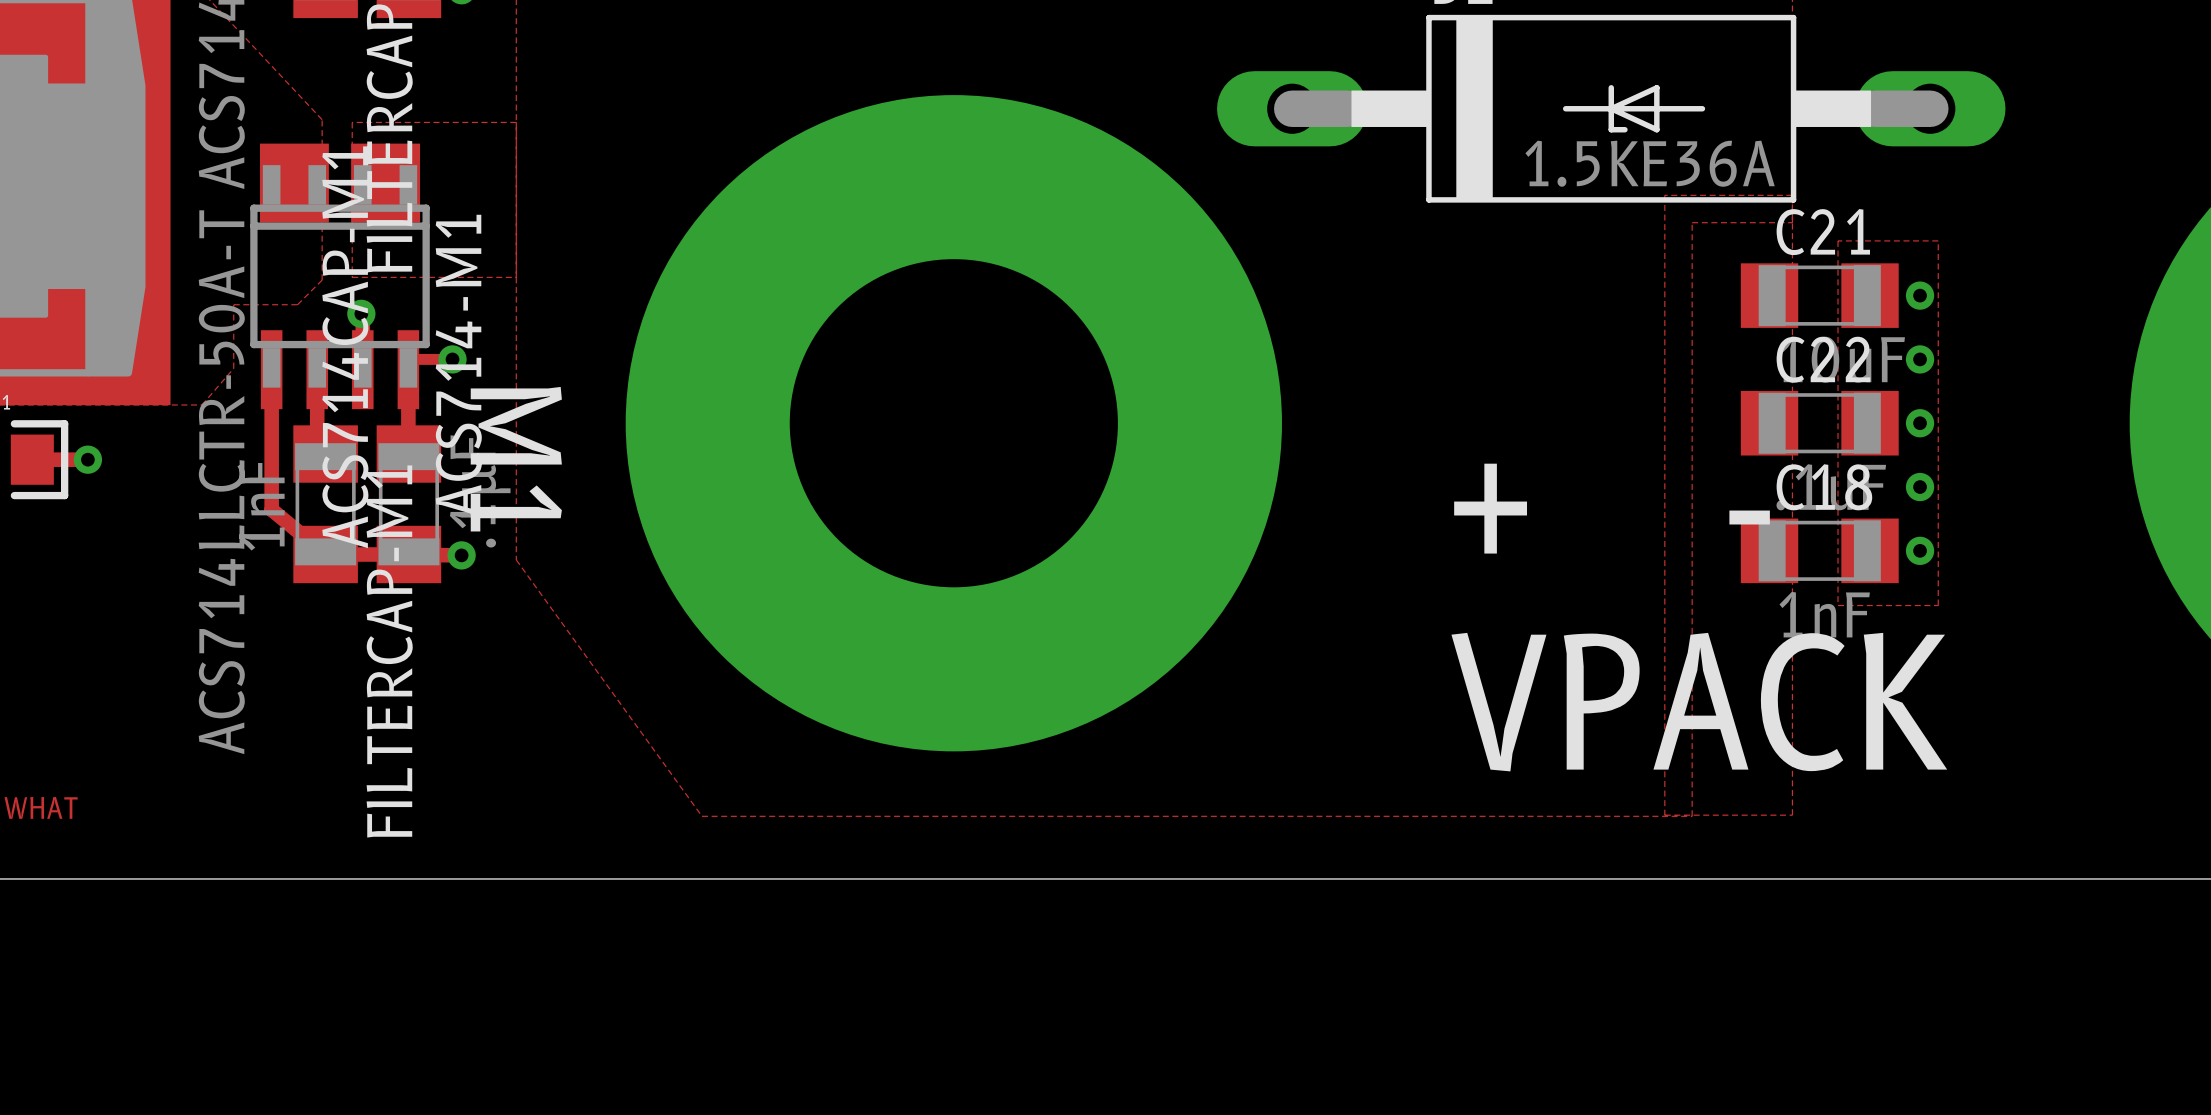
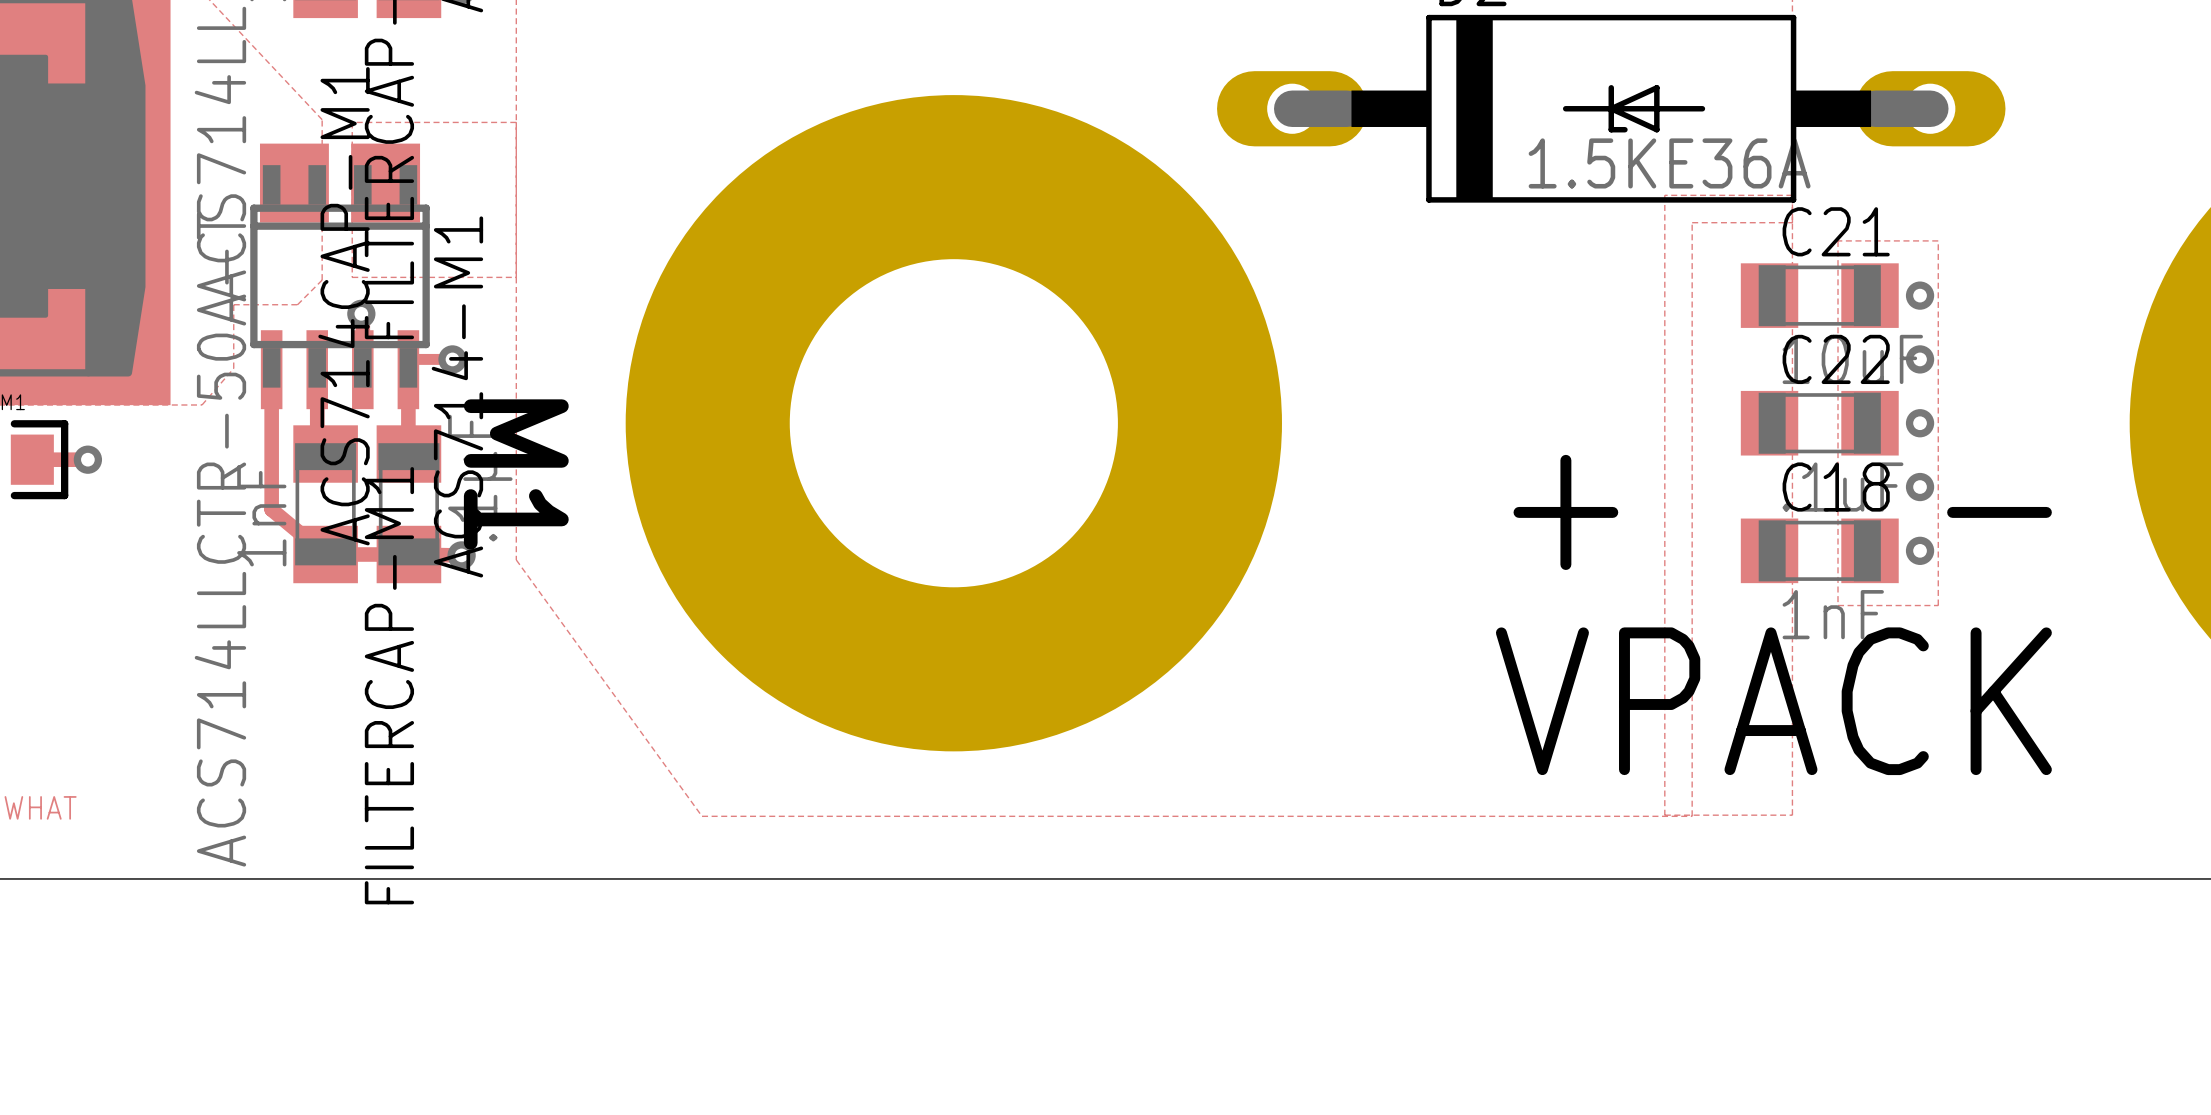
text position: + - (1612, 508) -> + - (1782, 512)
text position: VPACK (1699, 702) -> VPACK (1773, 701)

